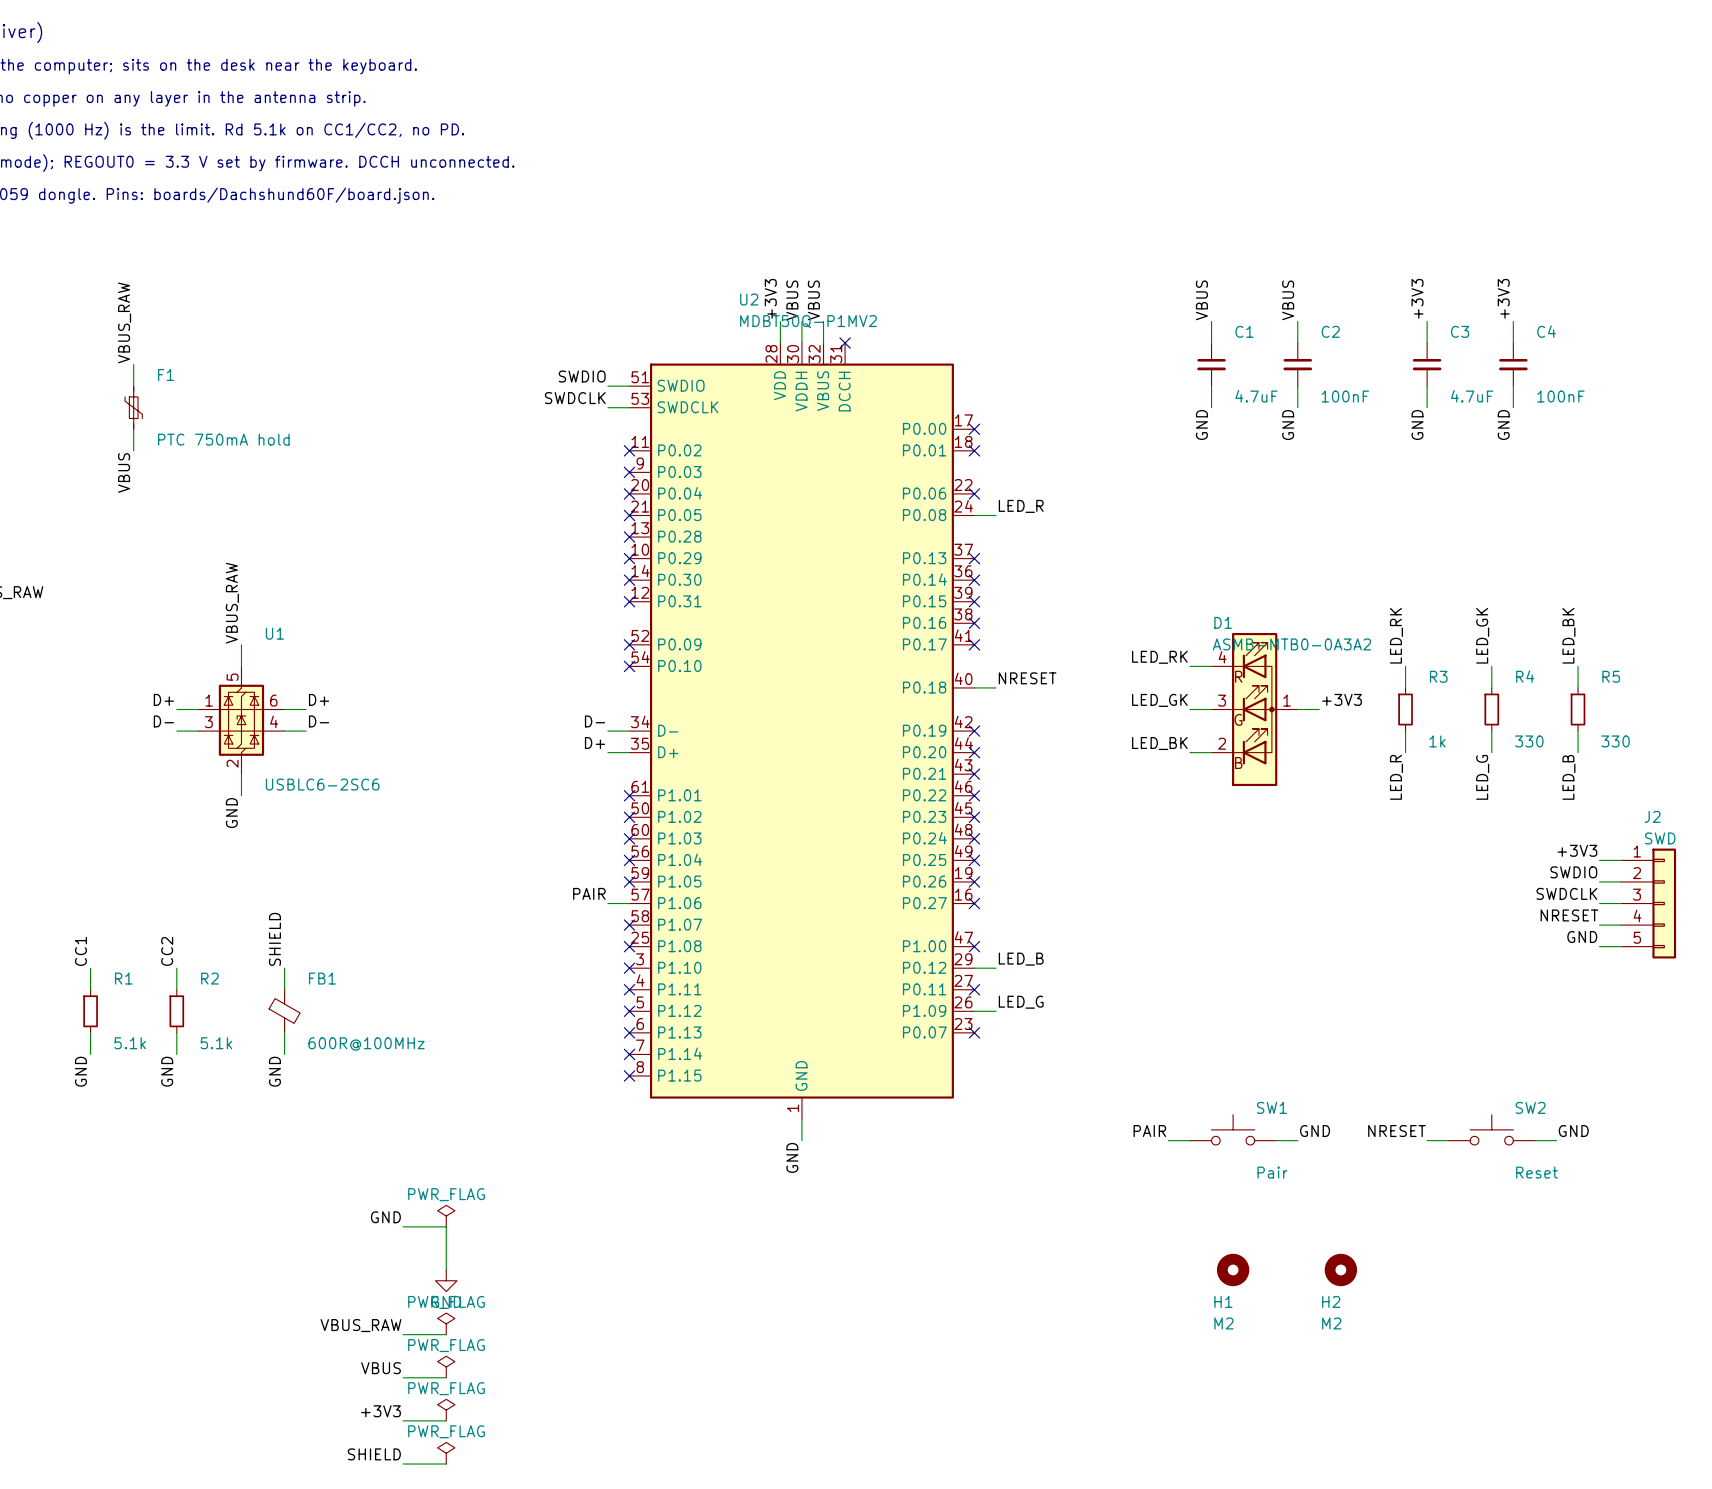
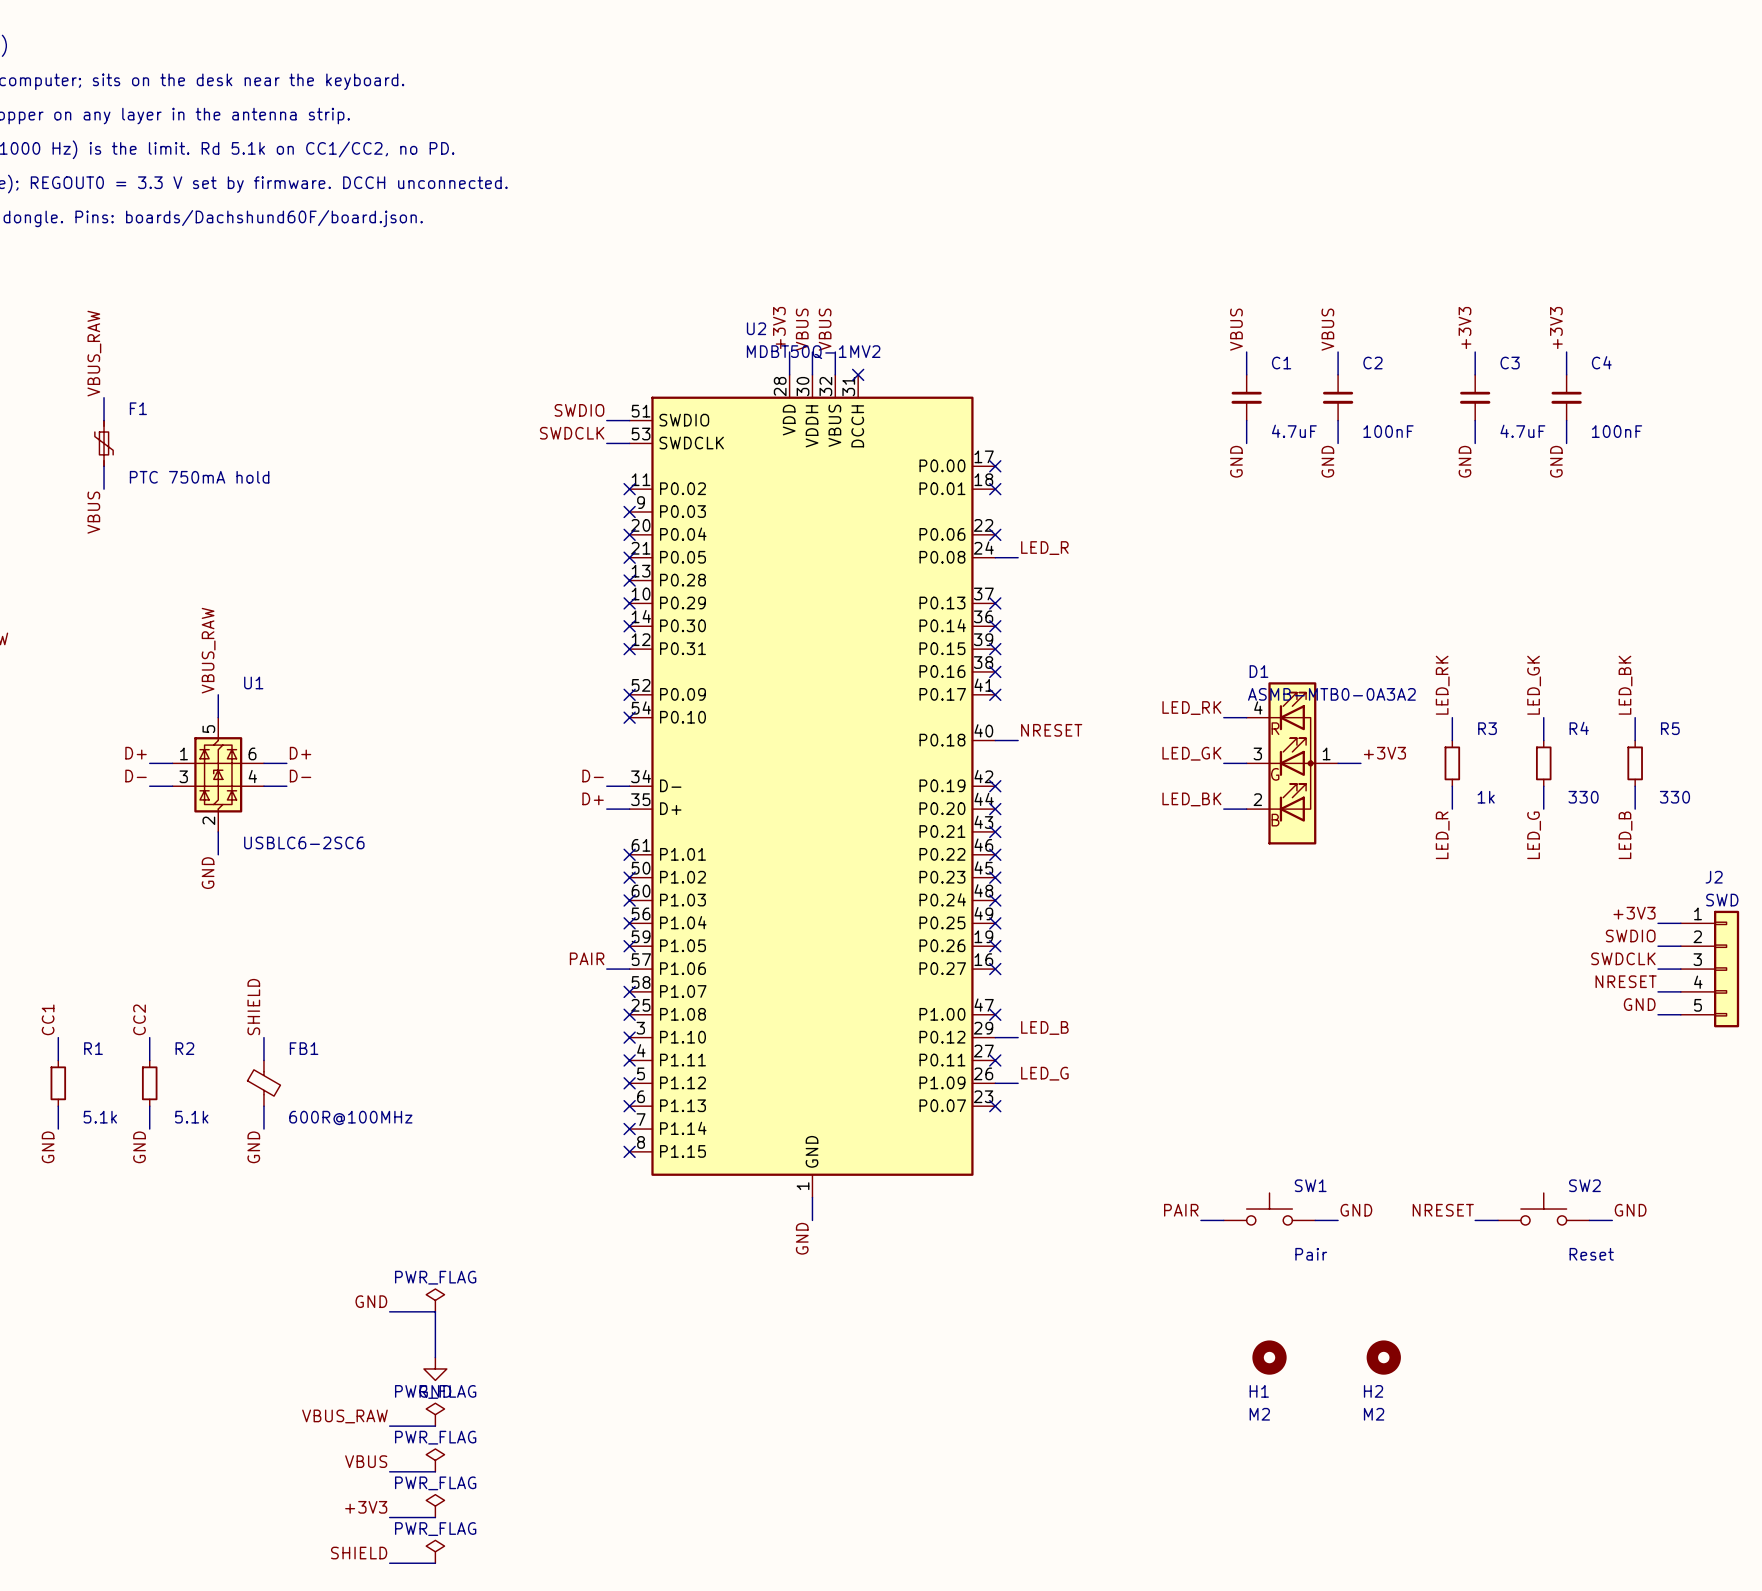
U2 value: MDBT50Q-P1MV2 (808, 321) -> MDBT50Q-1MV2 (813, 352)

